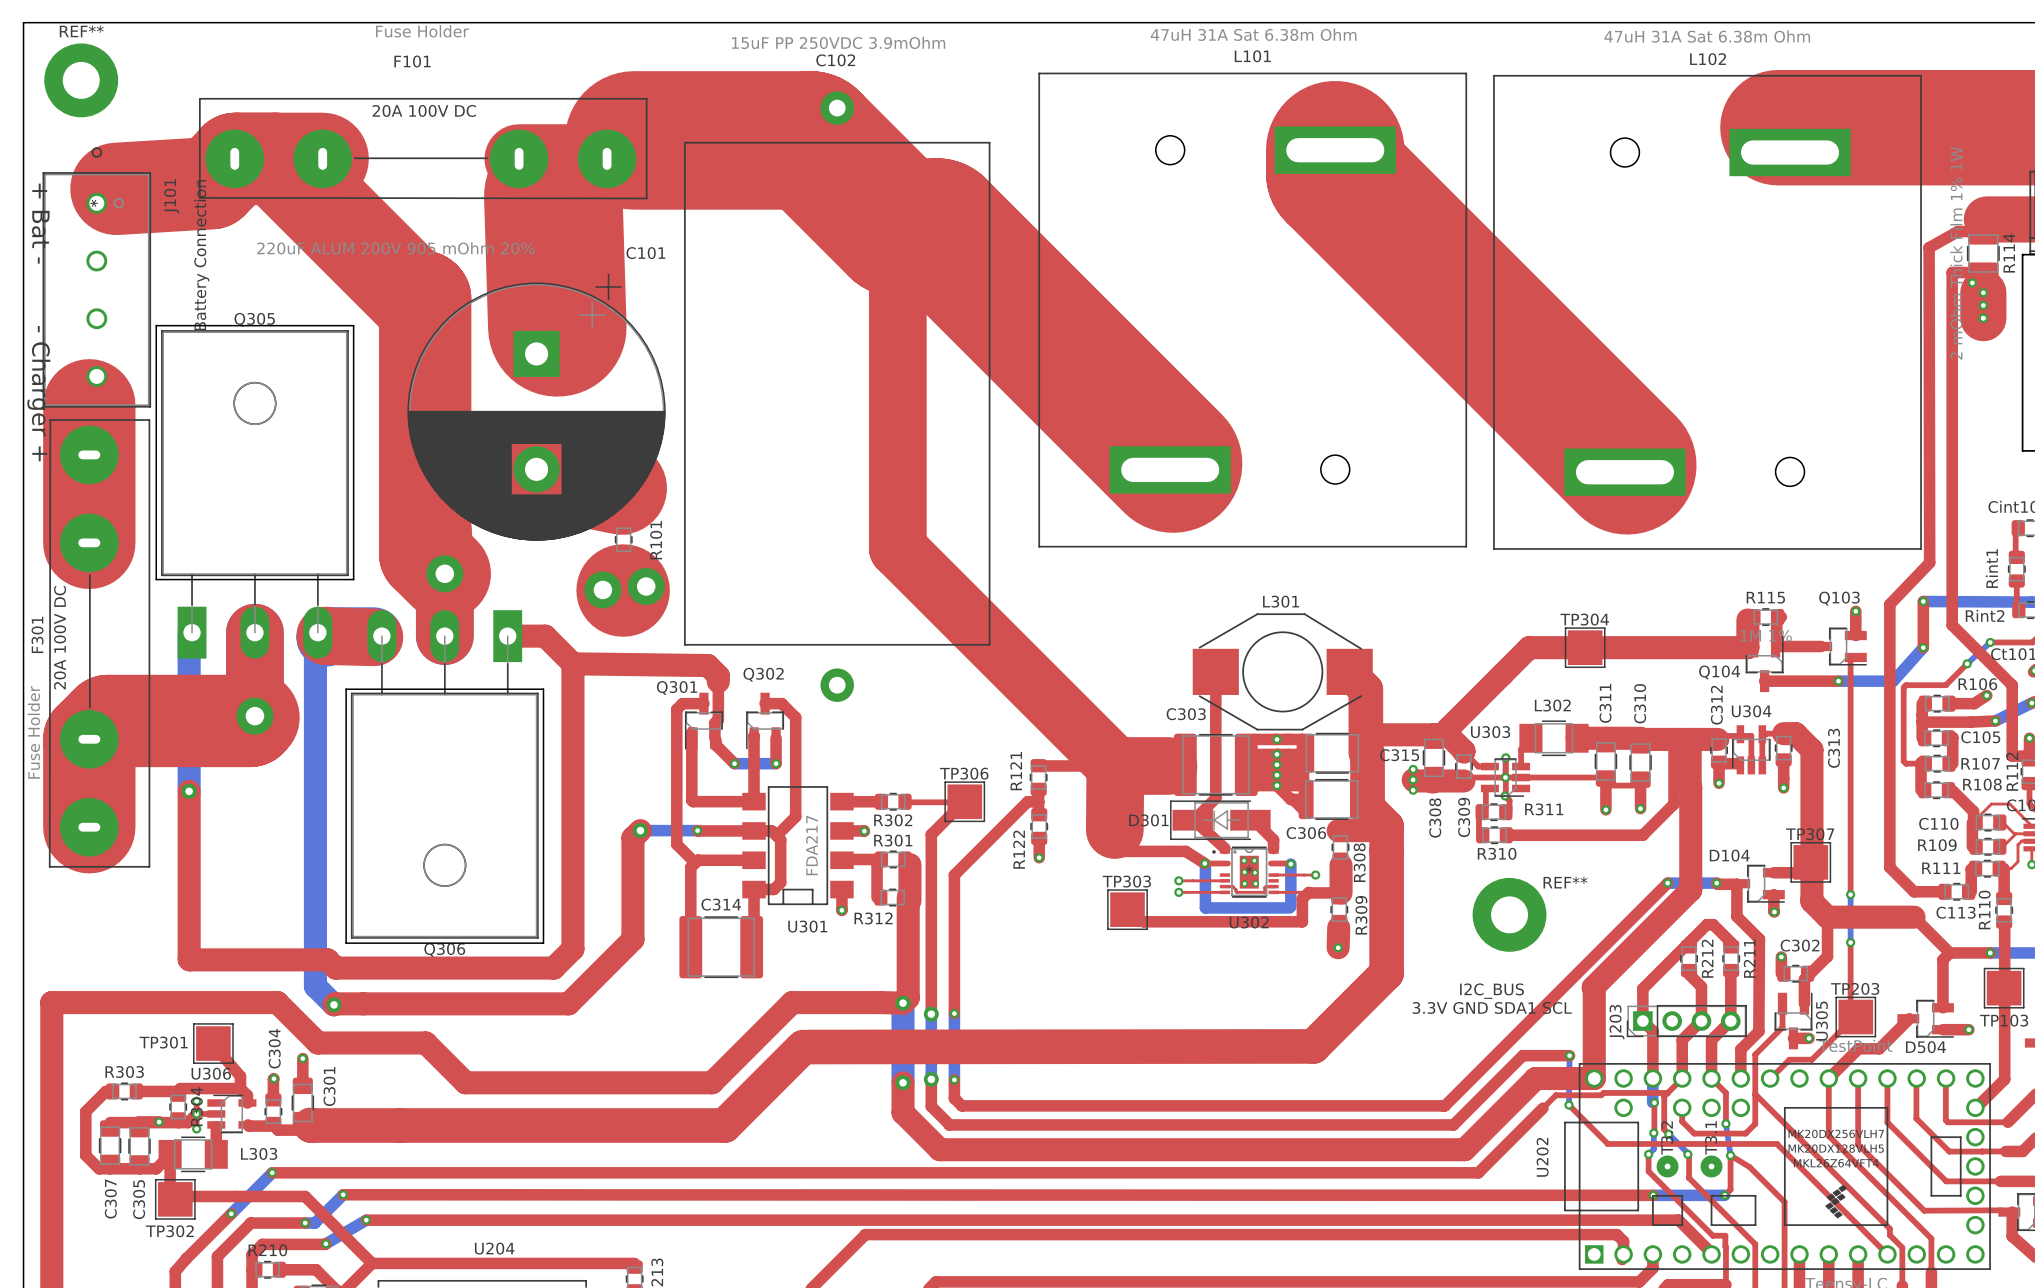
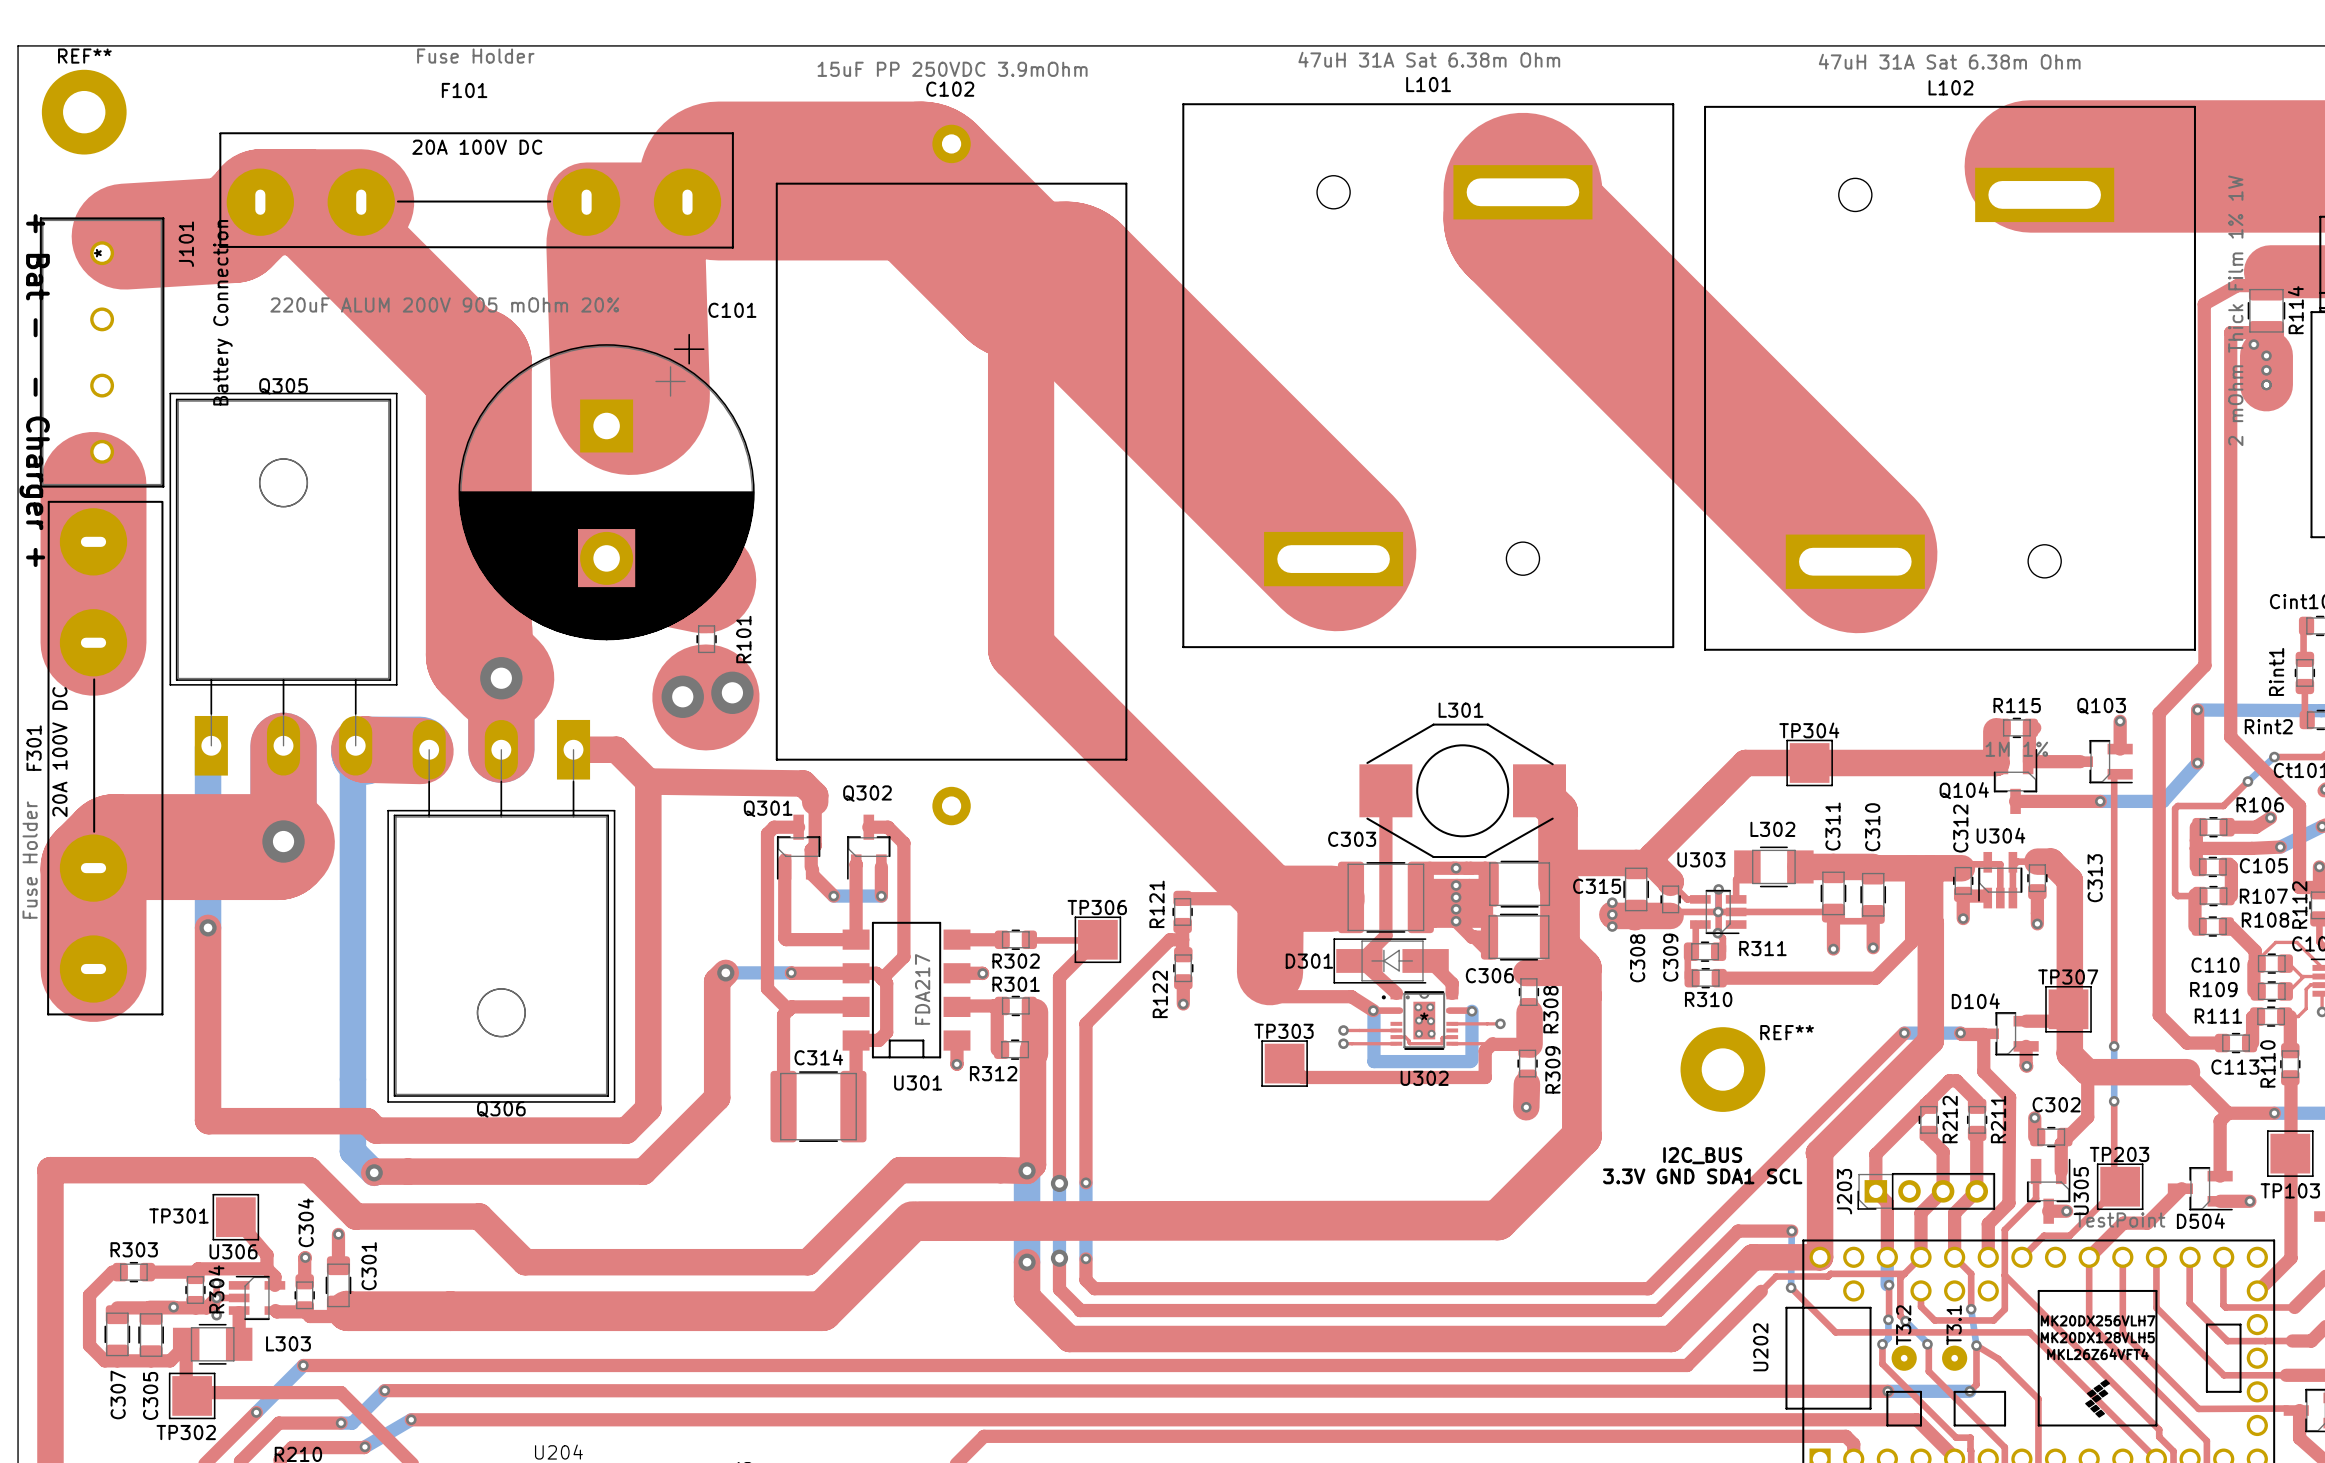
J101 footprint: [42, 147, 152, 408] -> [39, 217, 165, 488]

